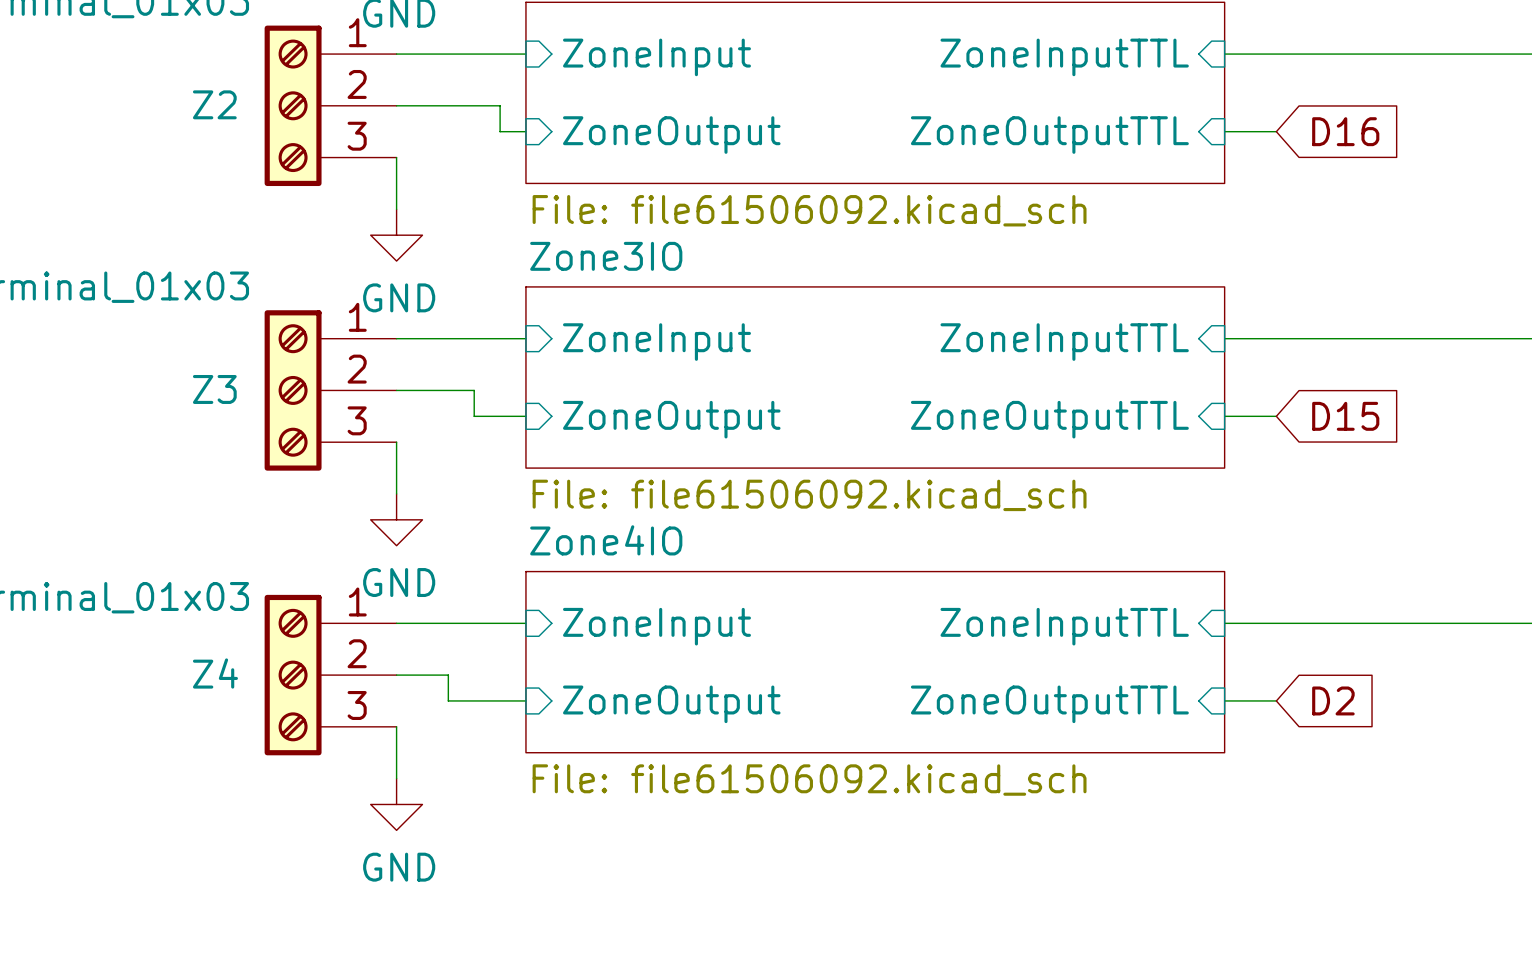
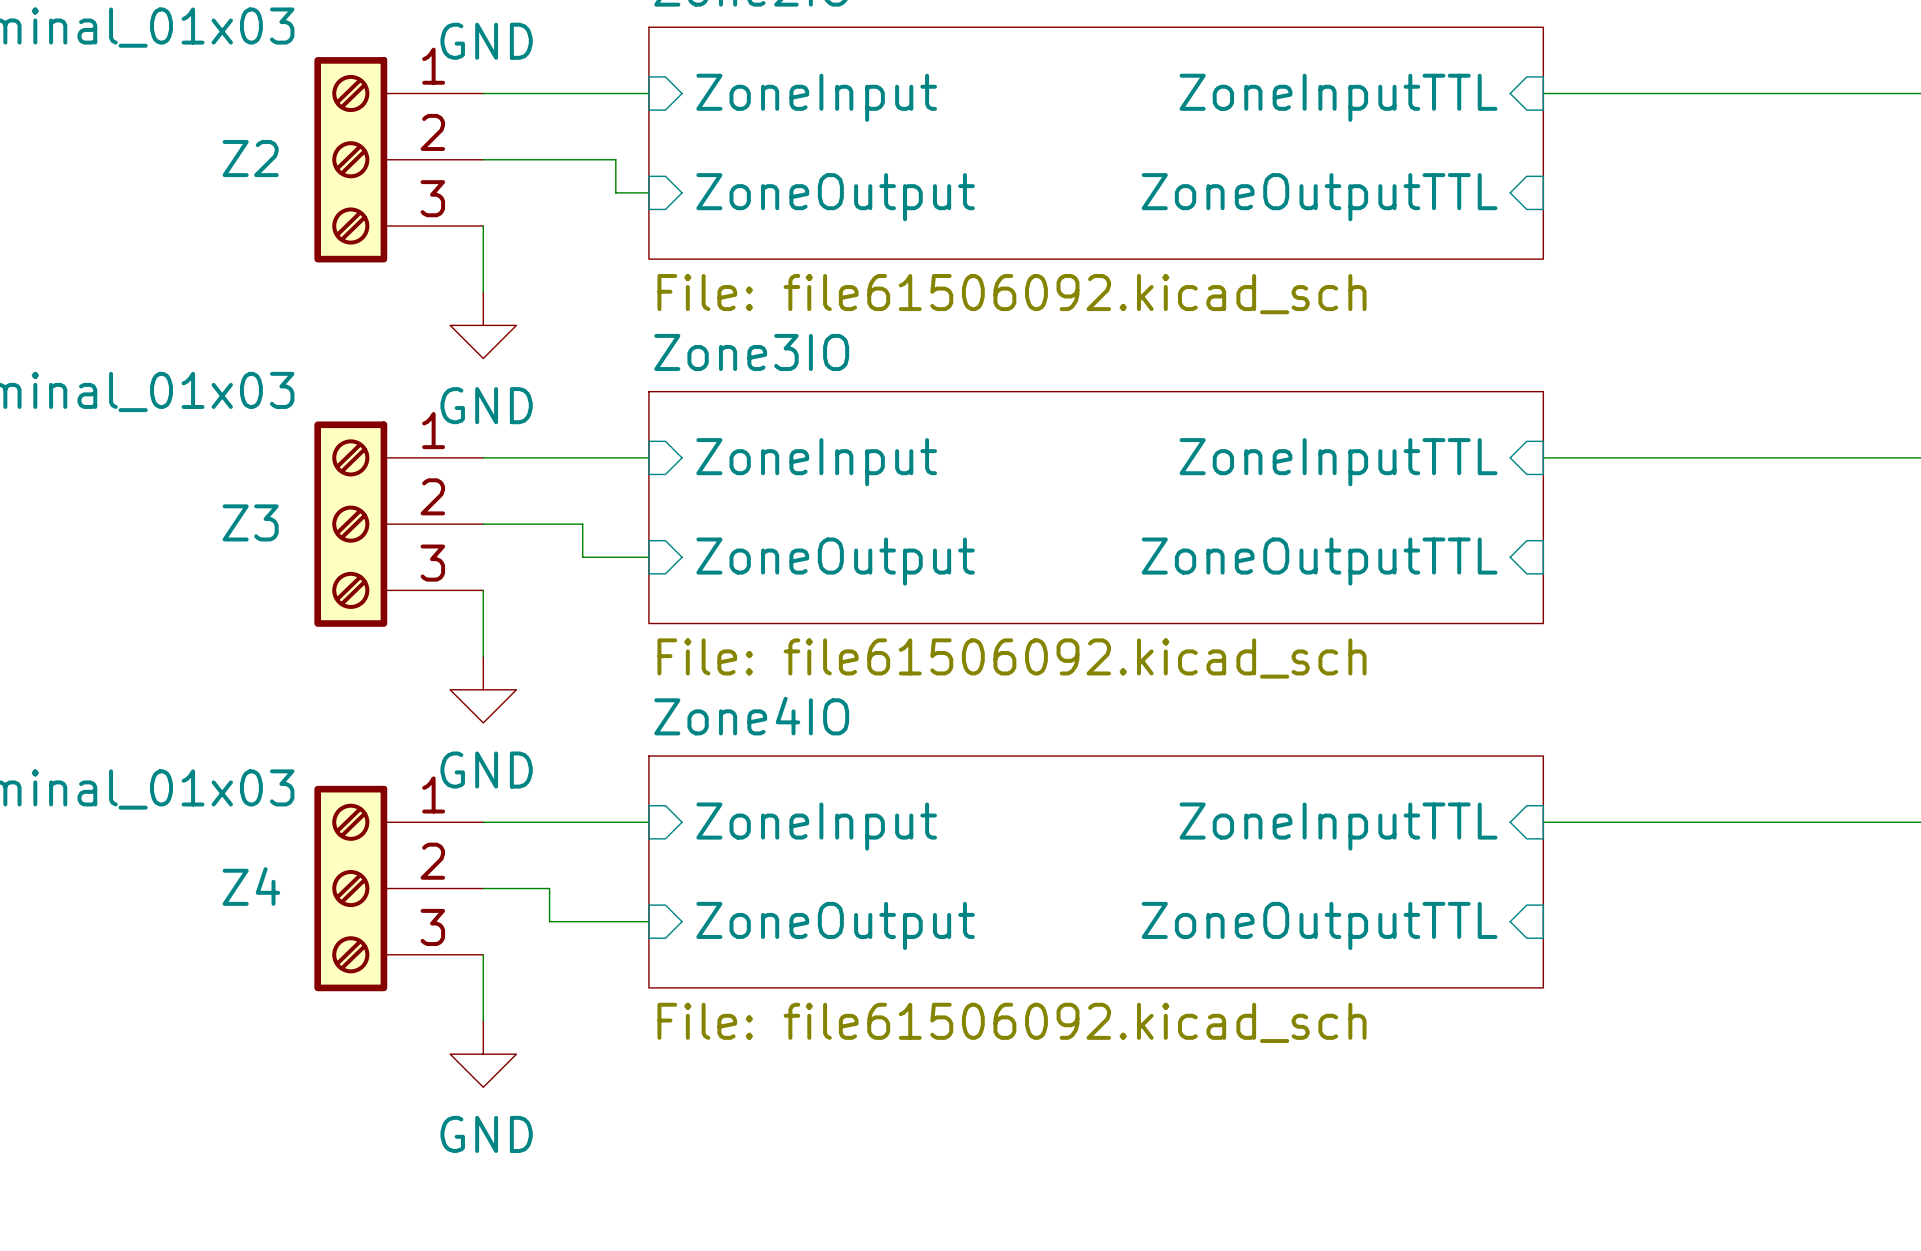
wire: (1224, 131) (1276, 131) -> none
global label: D16 (1345, 131) -> none
wire: (1224, 416) (1276, 416) -> none
global label: D15 (1345, 416) -> none
wire: (1224, 700) (1276, 700) -> none
global label: D2 (1333, 700) -> none

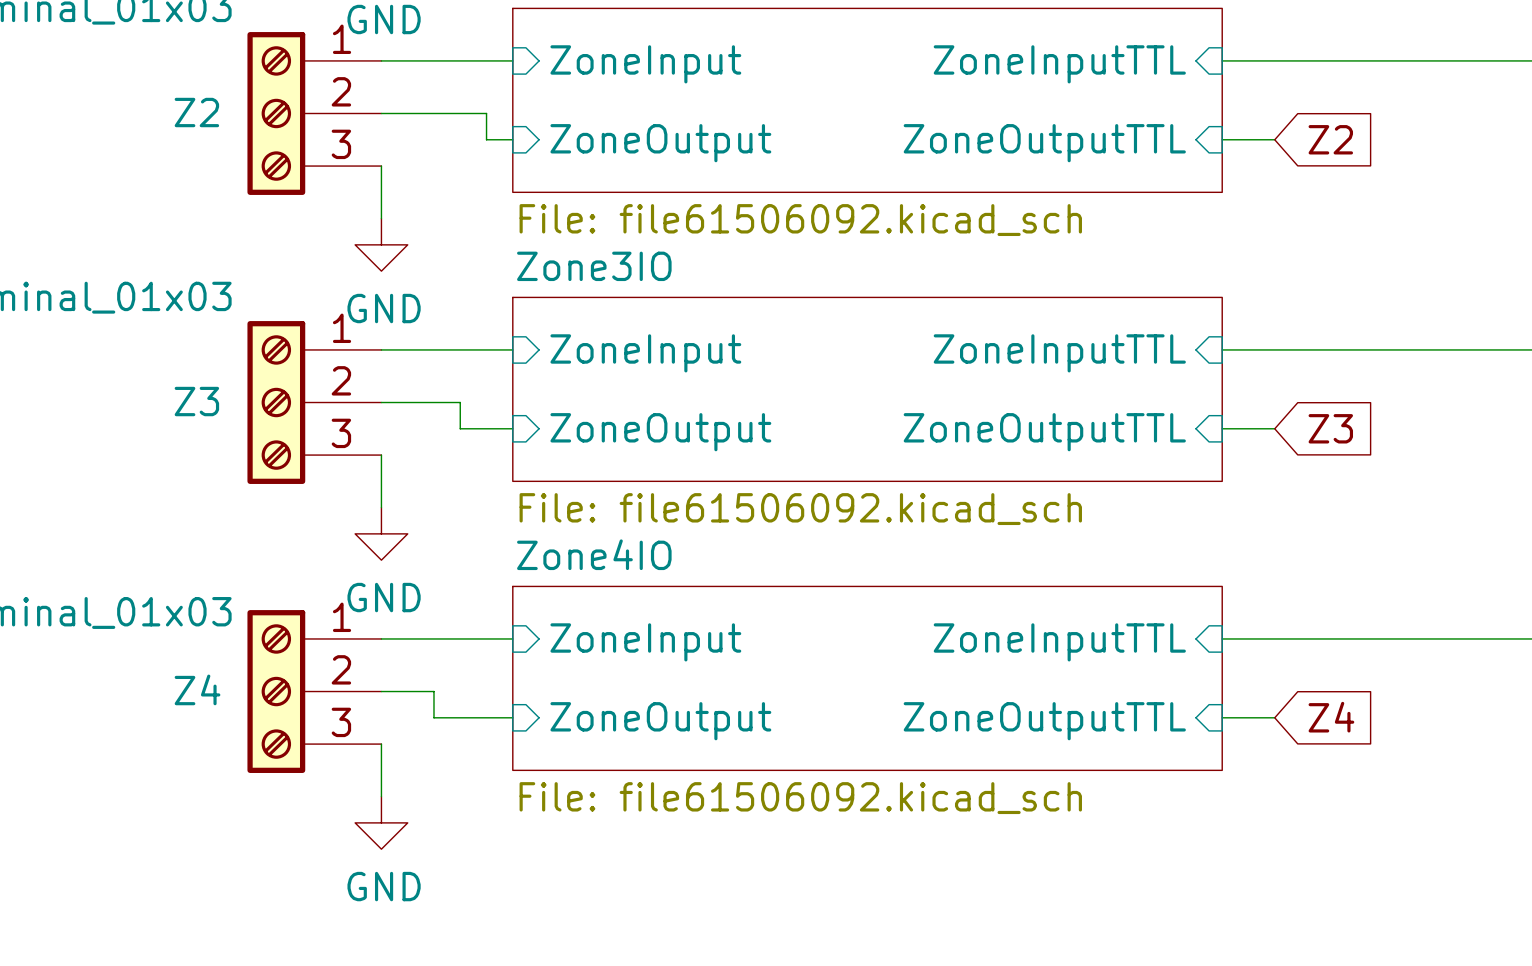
wire: none -> (1222, 139) (1274, 139)
global label: none -> Z2 (1330, 139)
wire: none -> (1222, 428) (1274, 428)
global label: none -> Z3 (1330, 428)
global label: none -> Z4 (1331, 717)
wire: none -> (1222, 717) (1274, 717)

